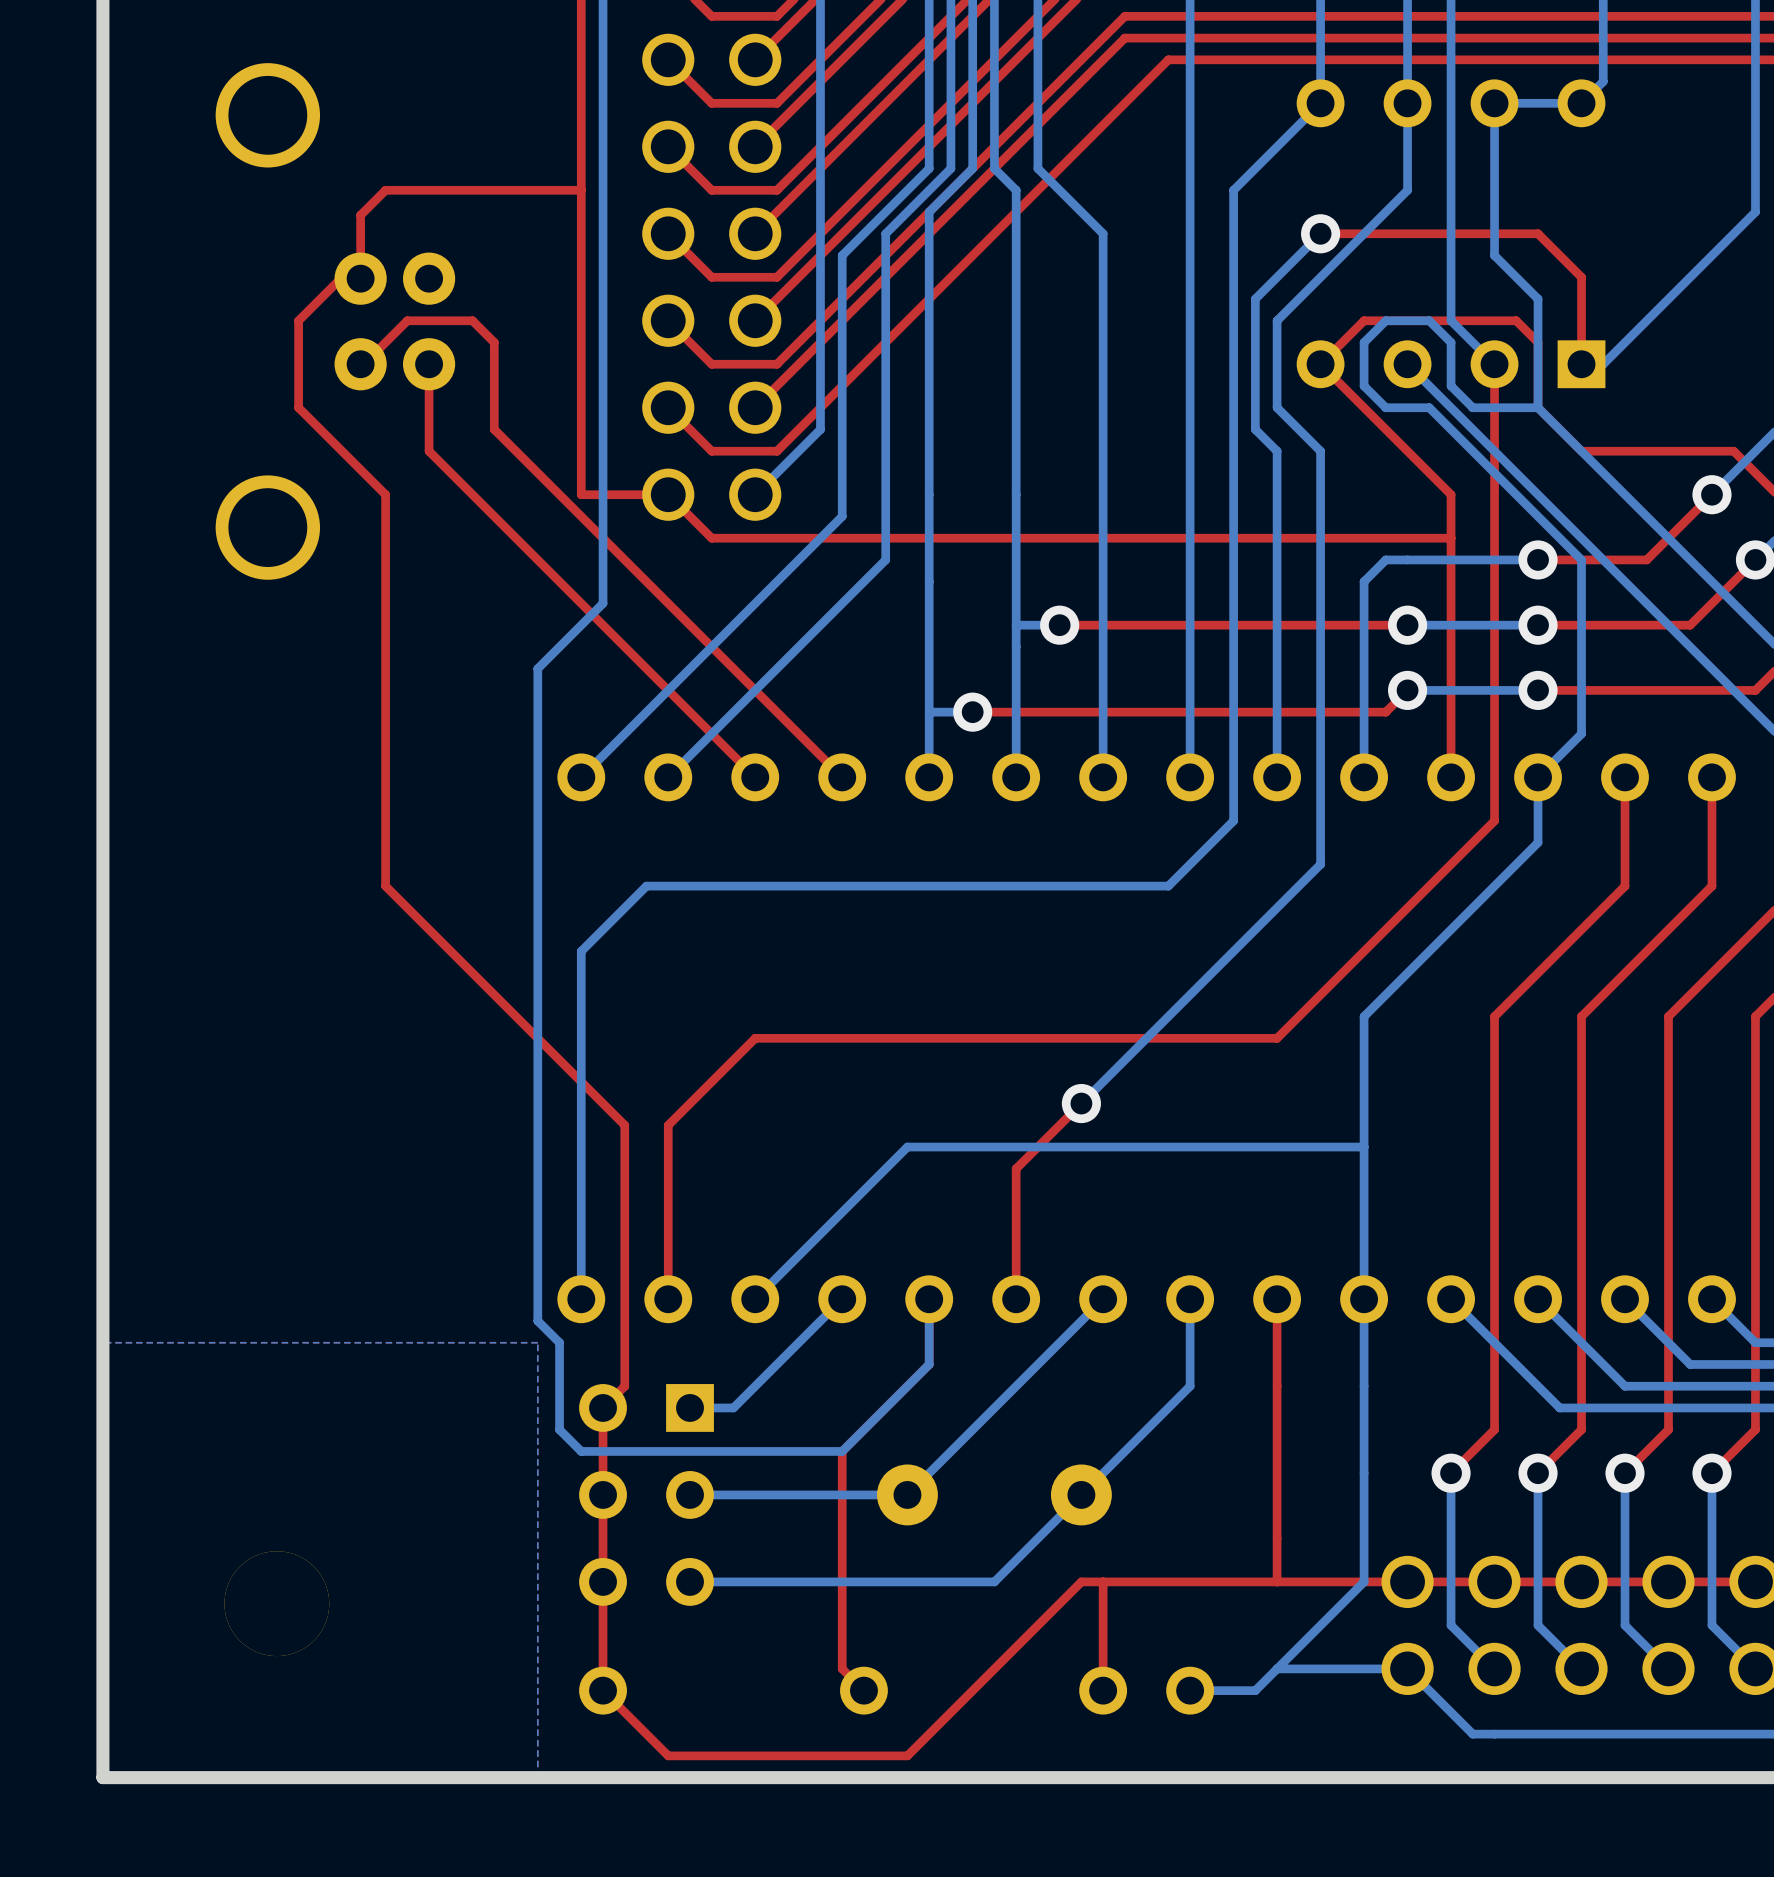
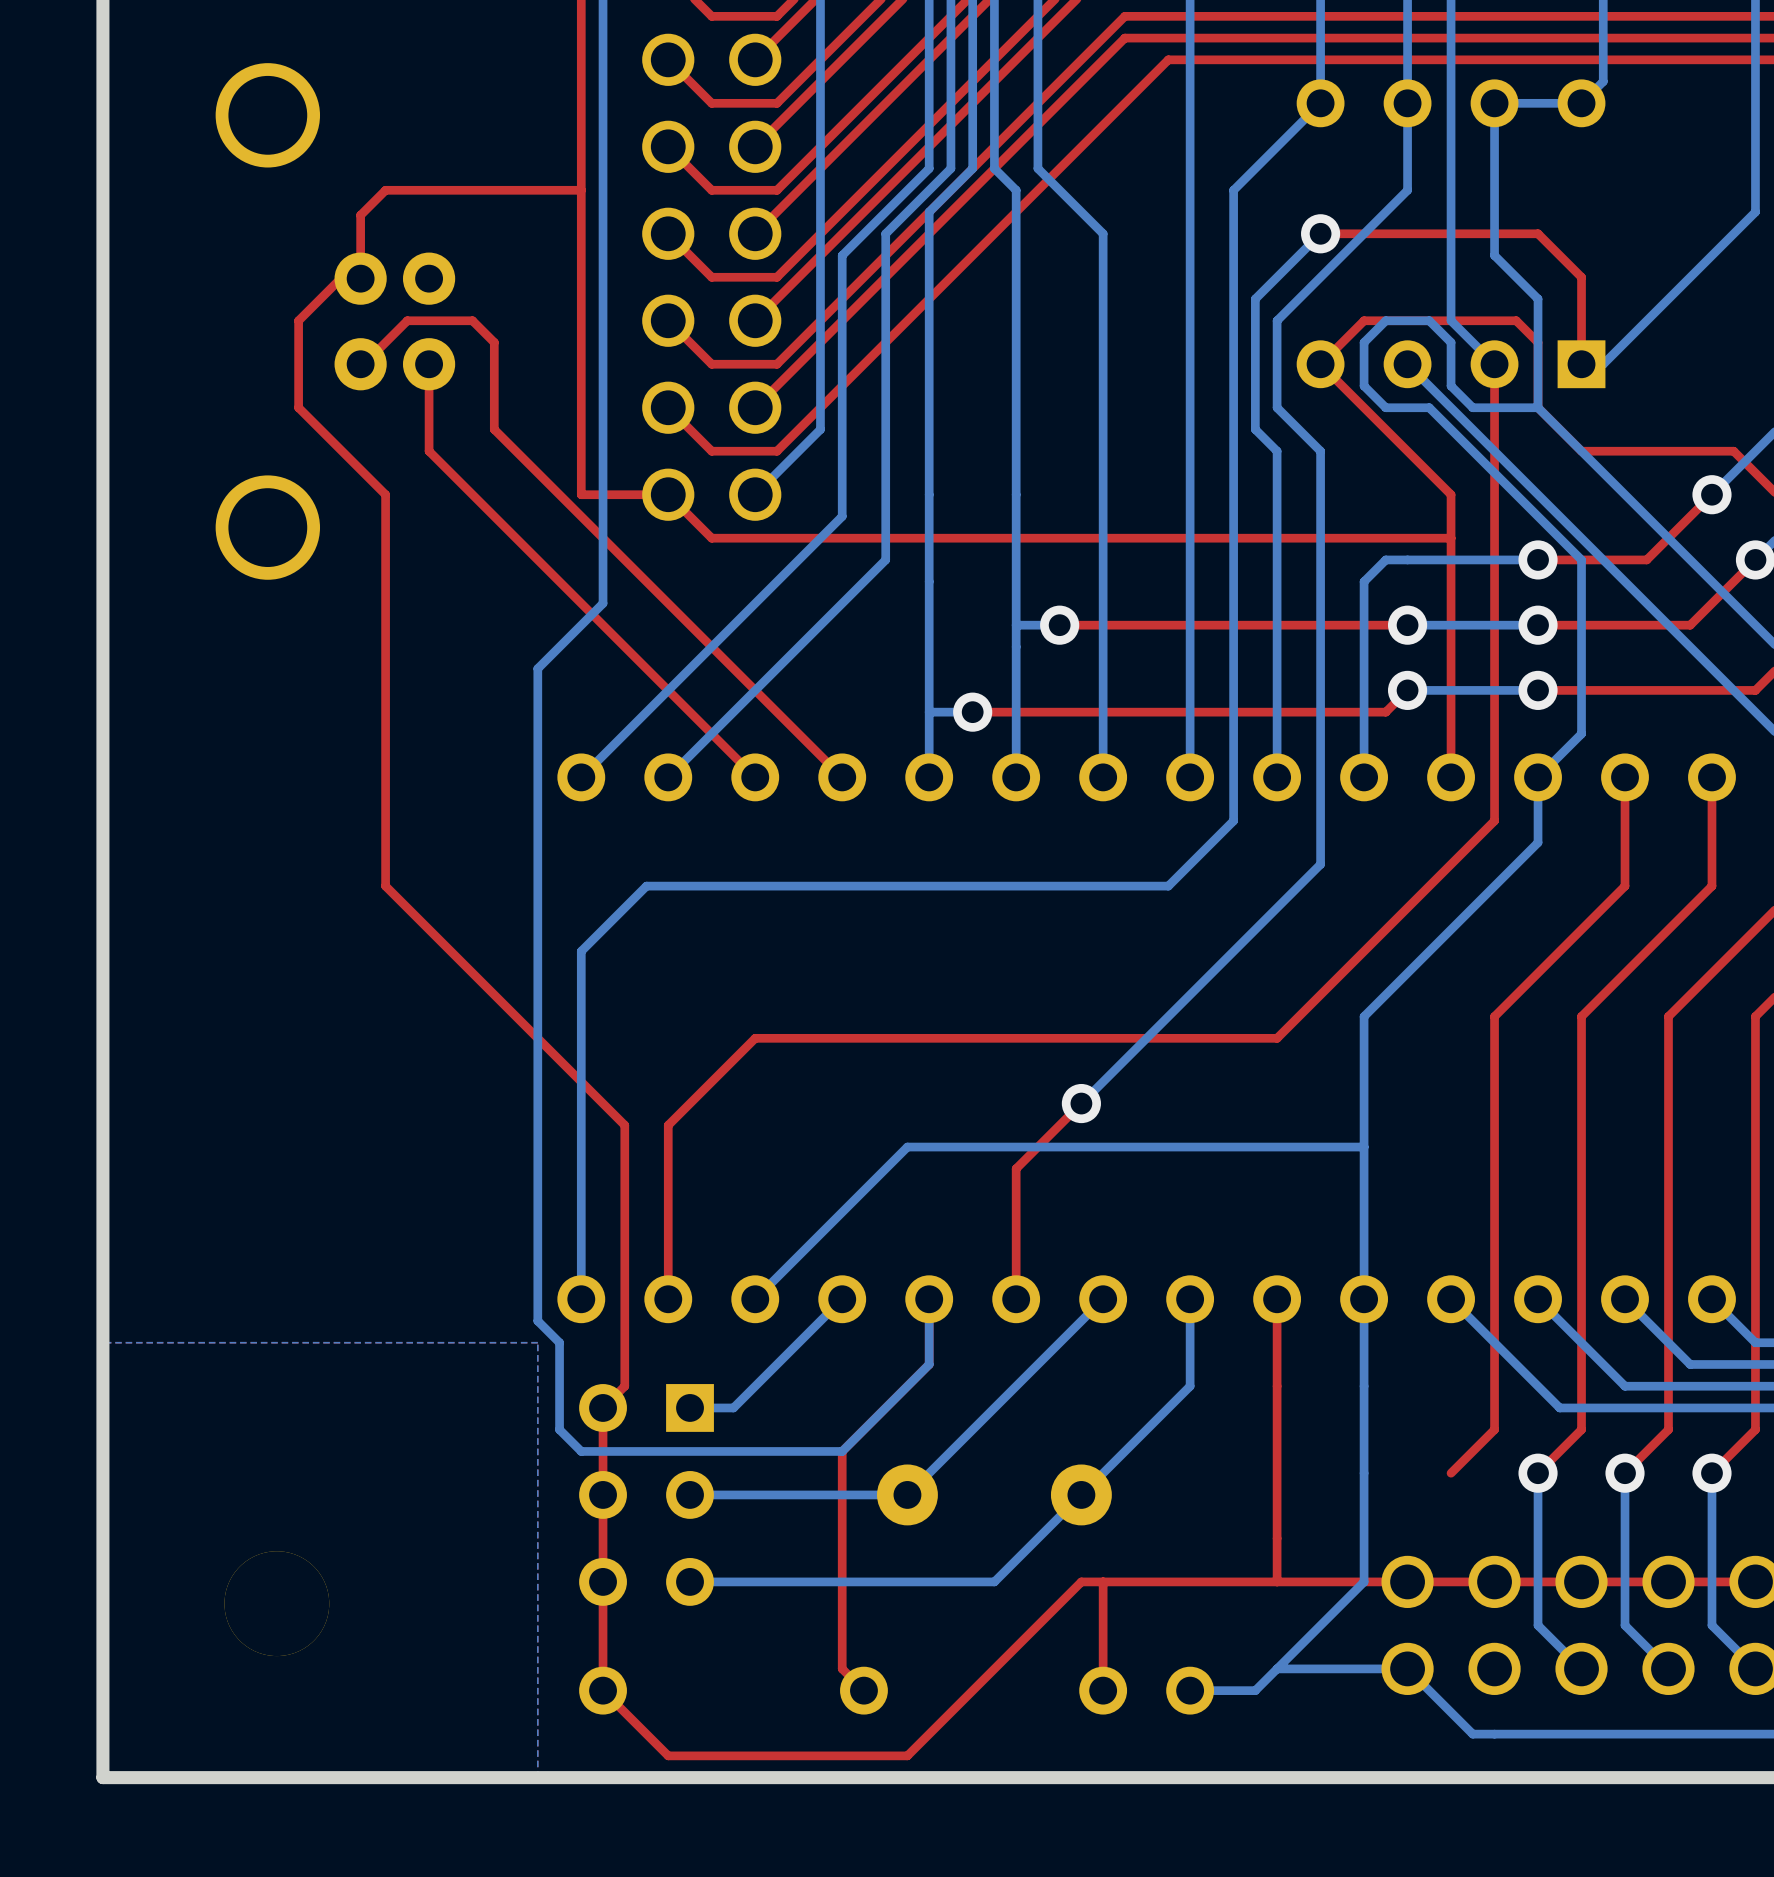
bottom track: (1451, 1473) (1451, 1625) (1494, 1668) -> none
via: (1451, 1473) -> none

